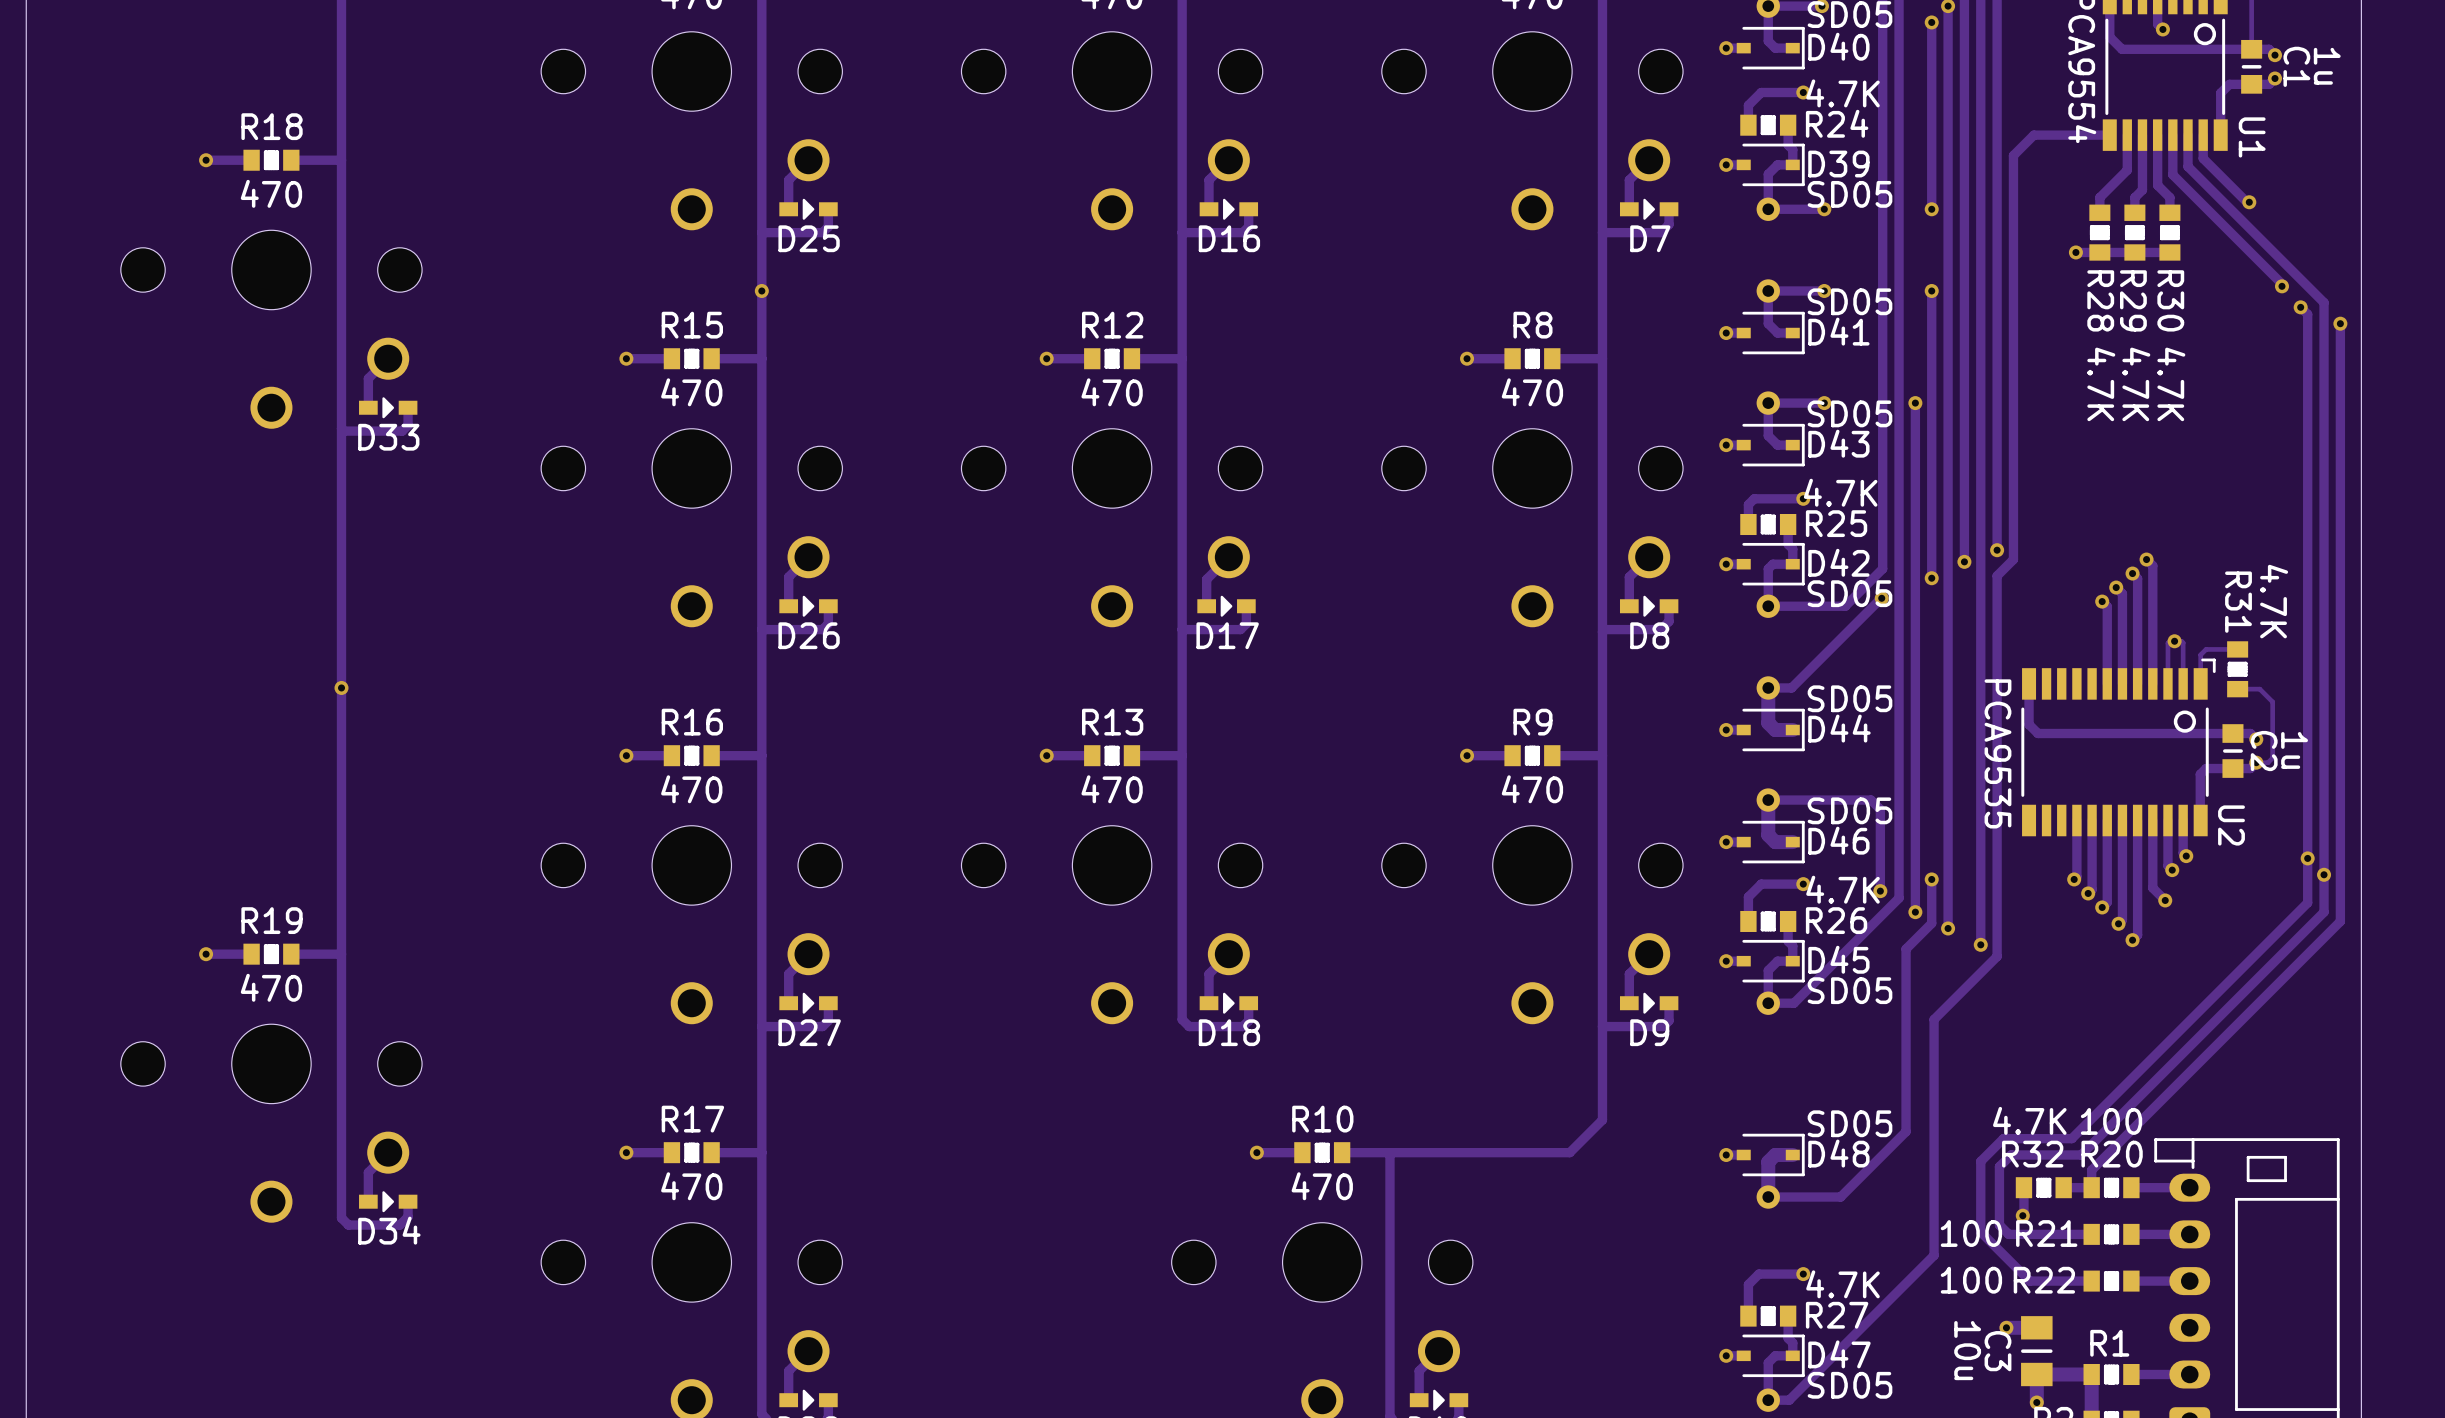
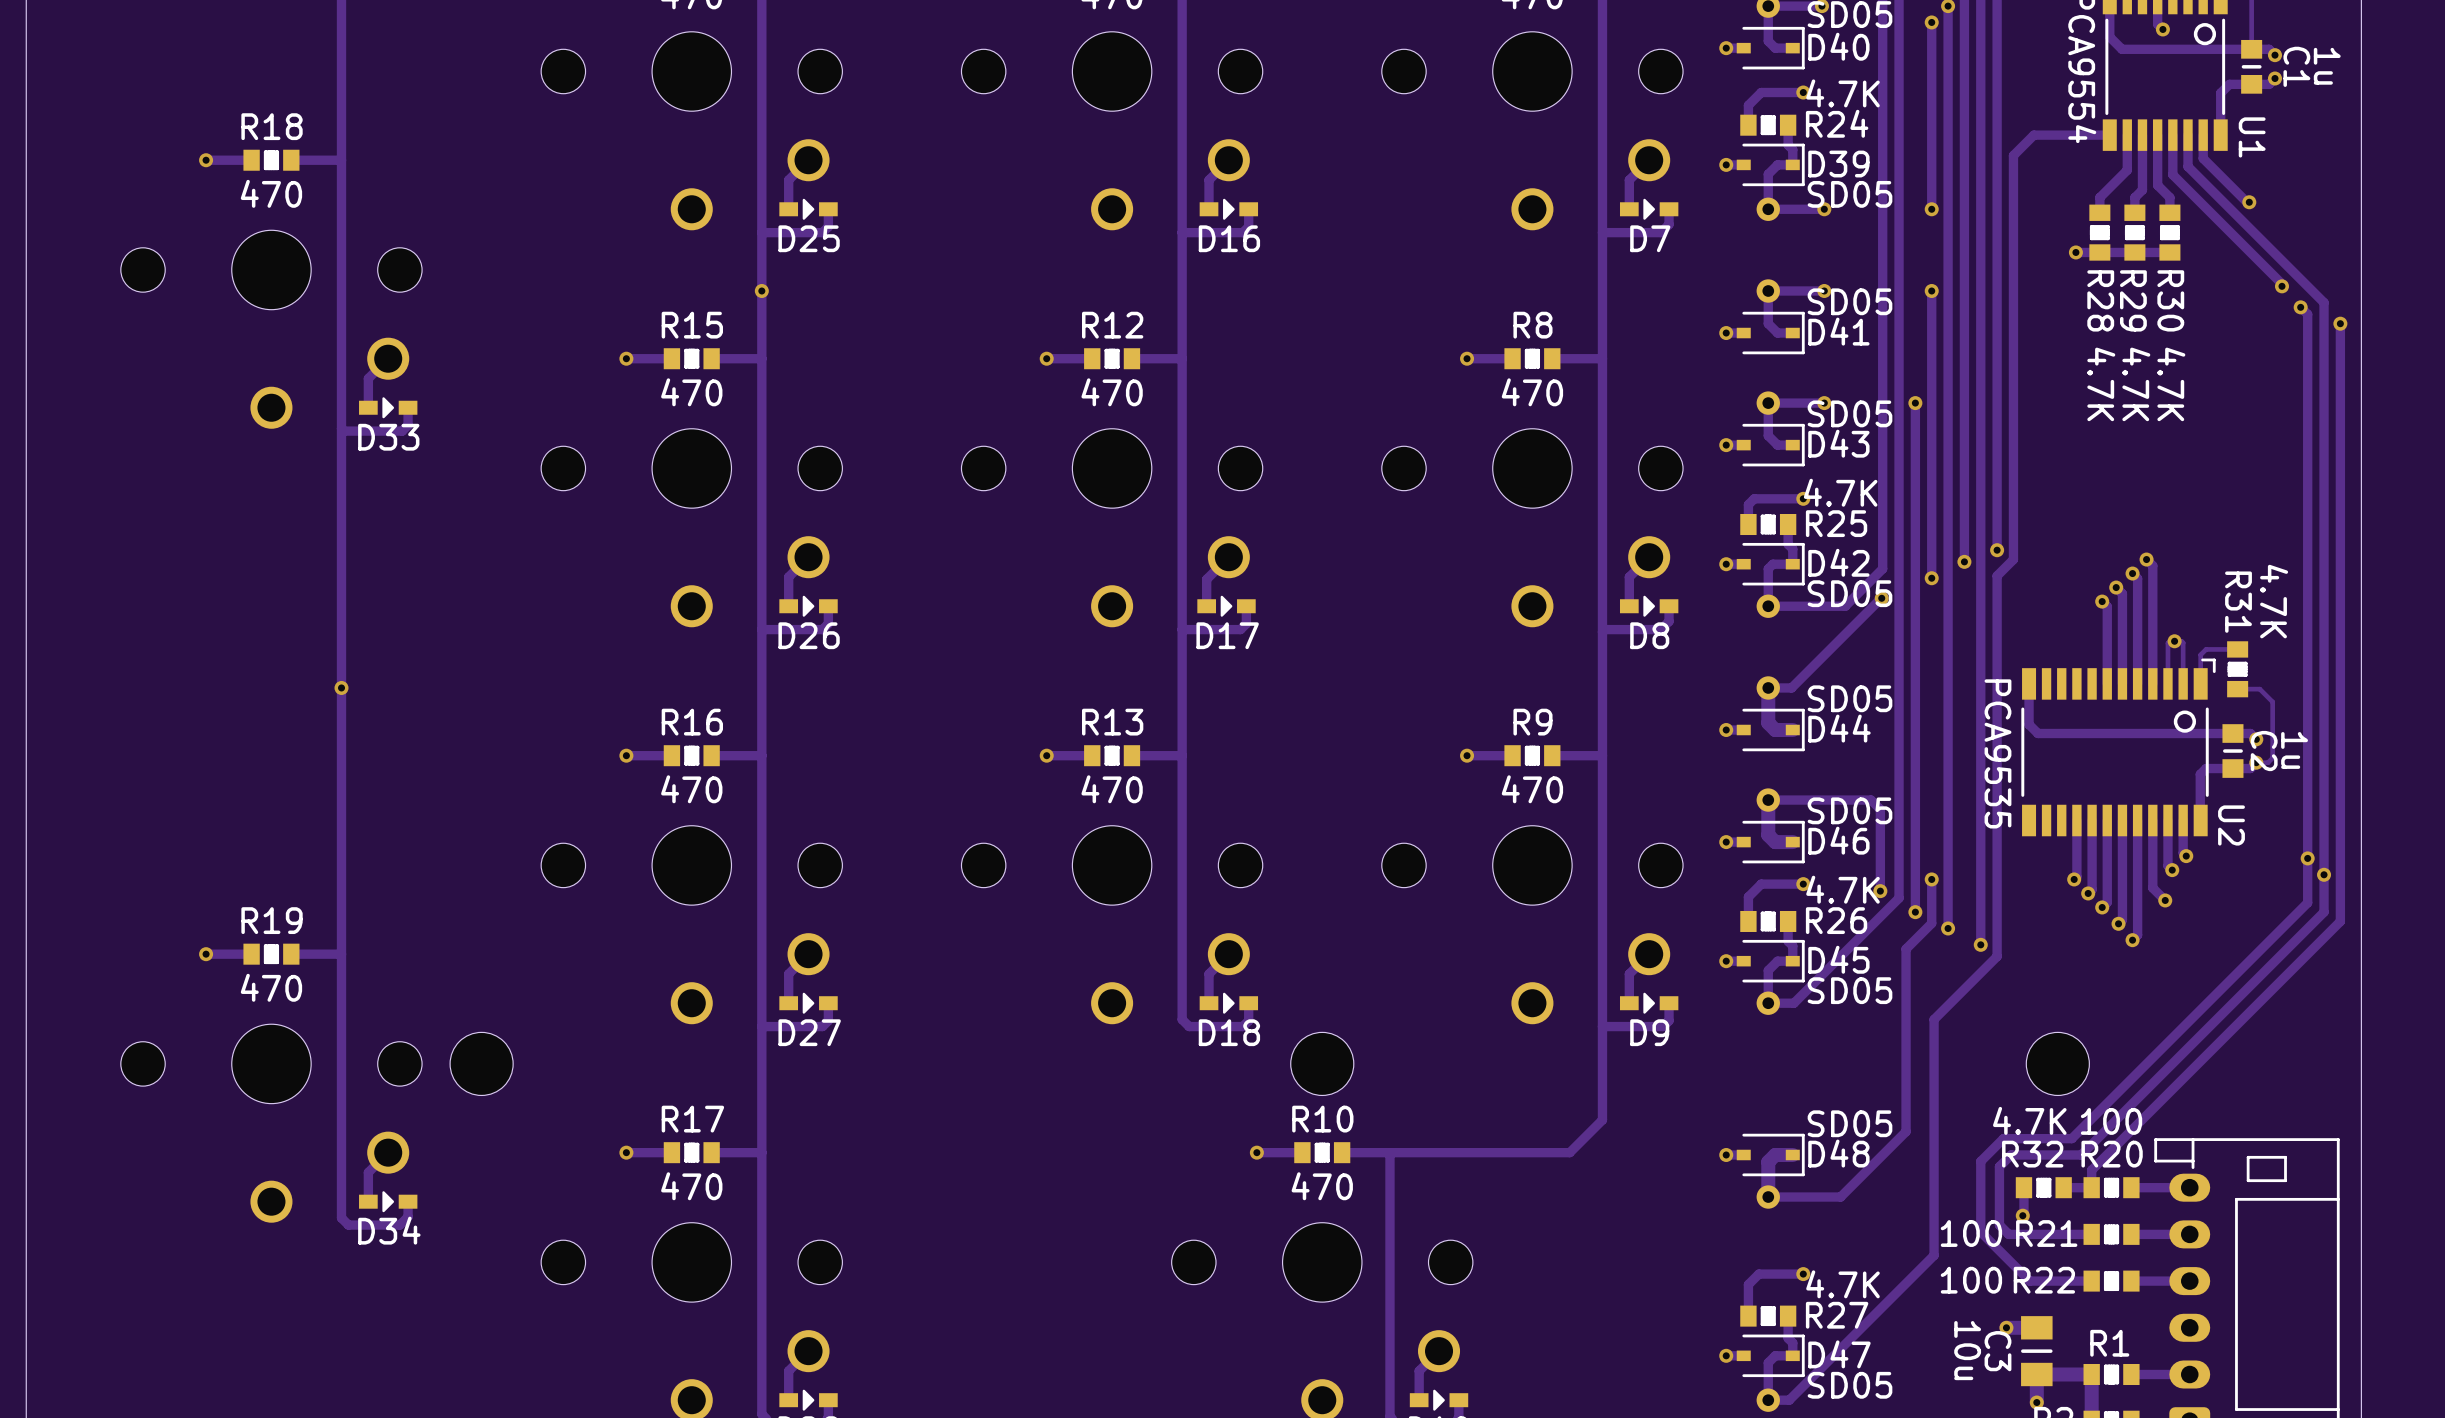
part: none -> (481, 1063)
part: none -> (1322, 1063)
part: none -> (2057, 1063)

